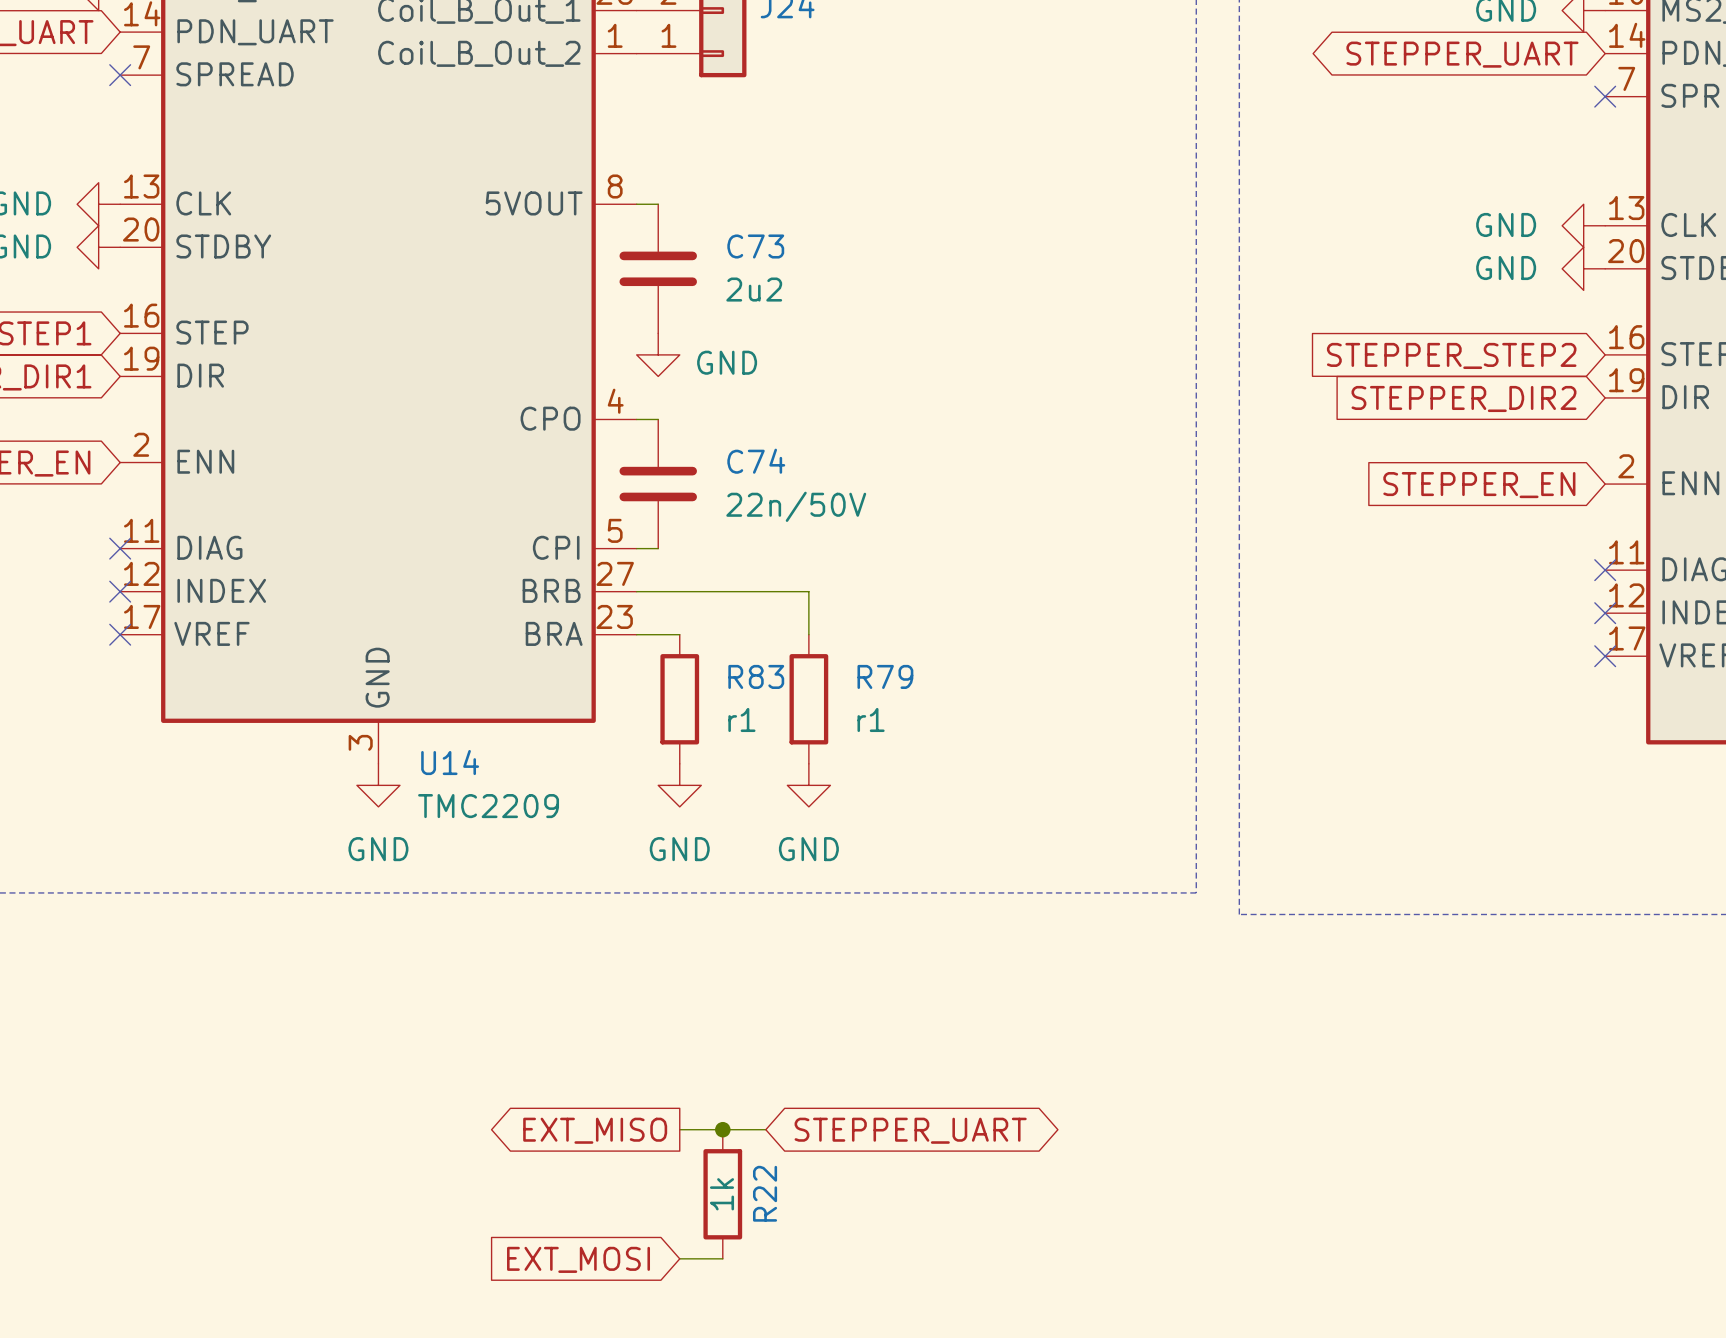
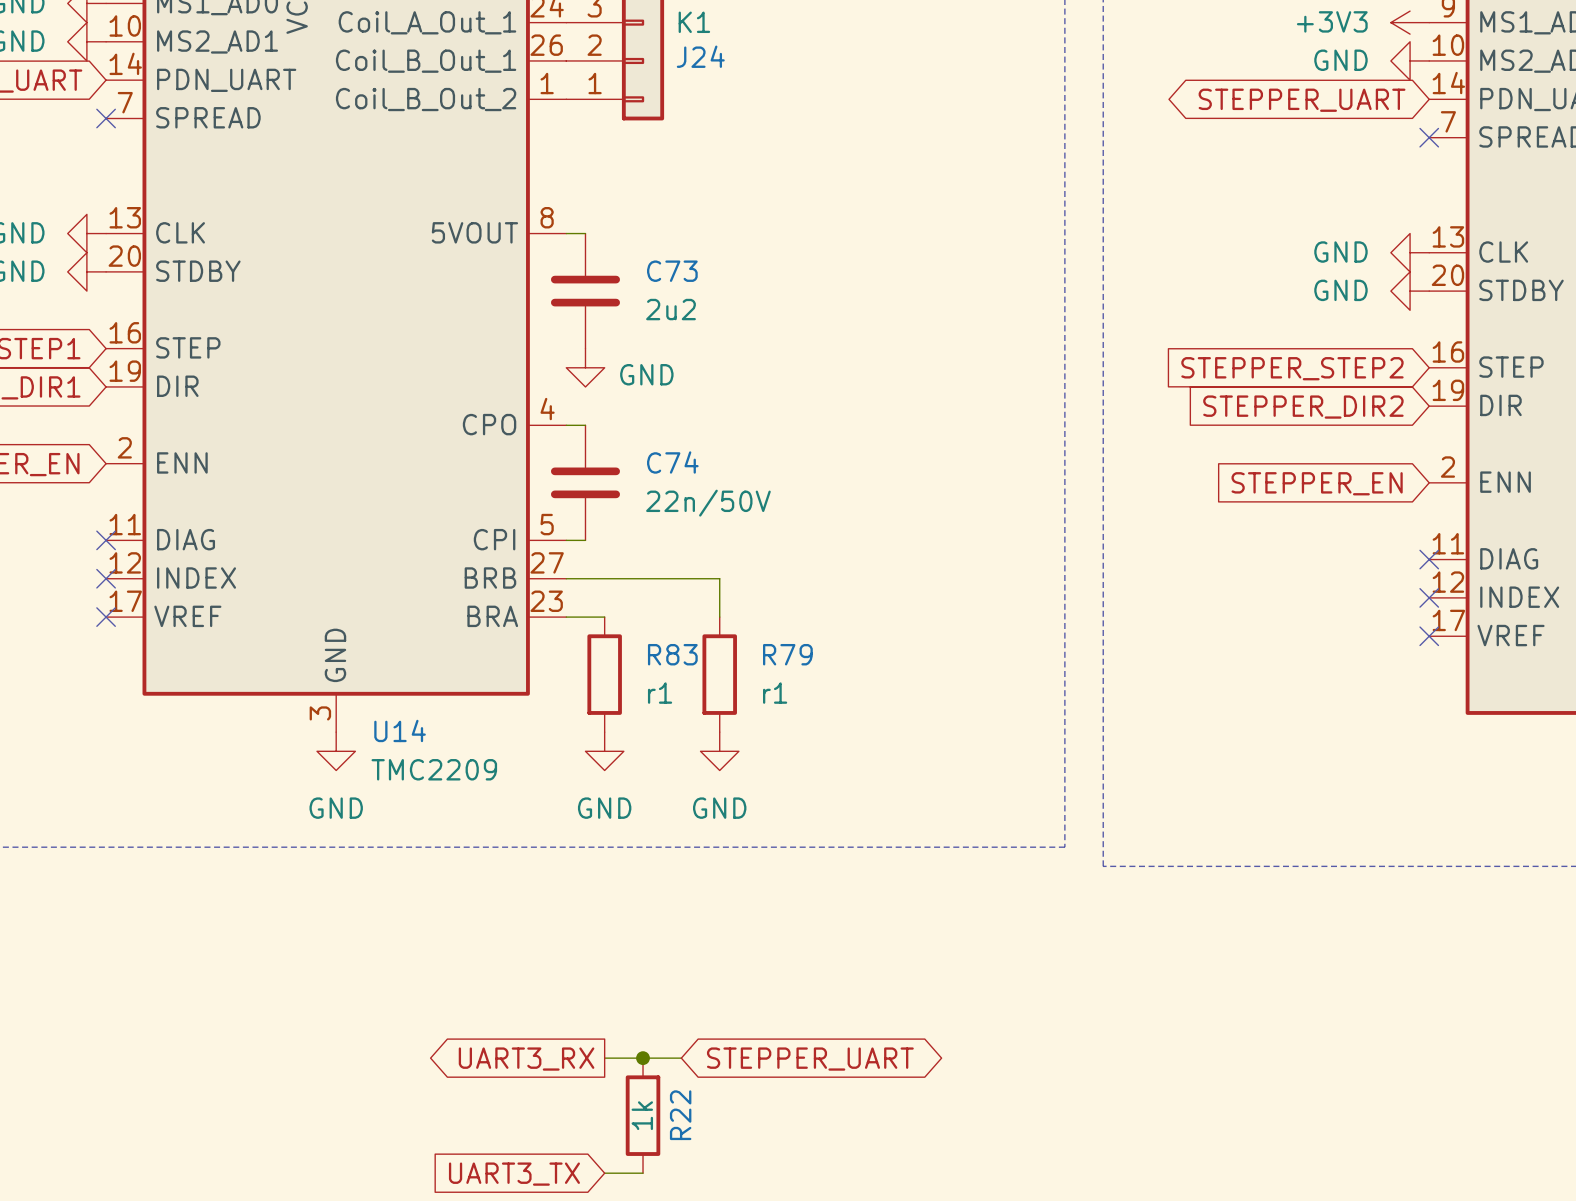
global label: EXT_MISO (595, 1130) -> UART3_RX (526, 1059)
global label: EXT_MOSI (578, 1259) -> UART3_TX (514, 1174)

